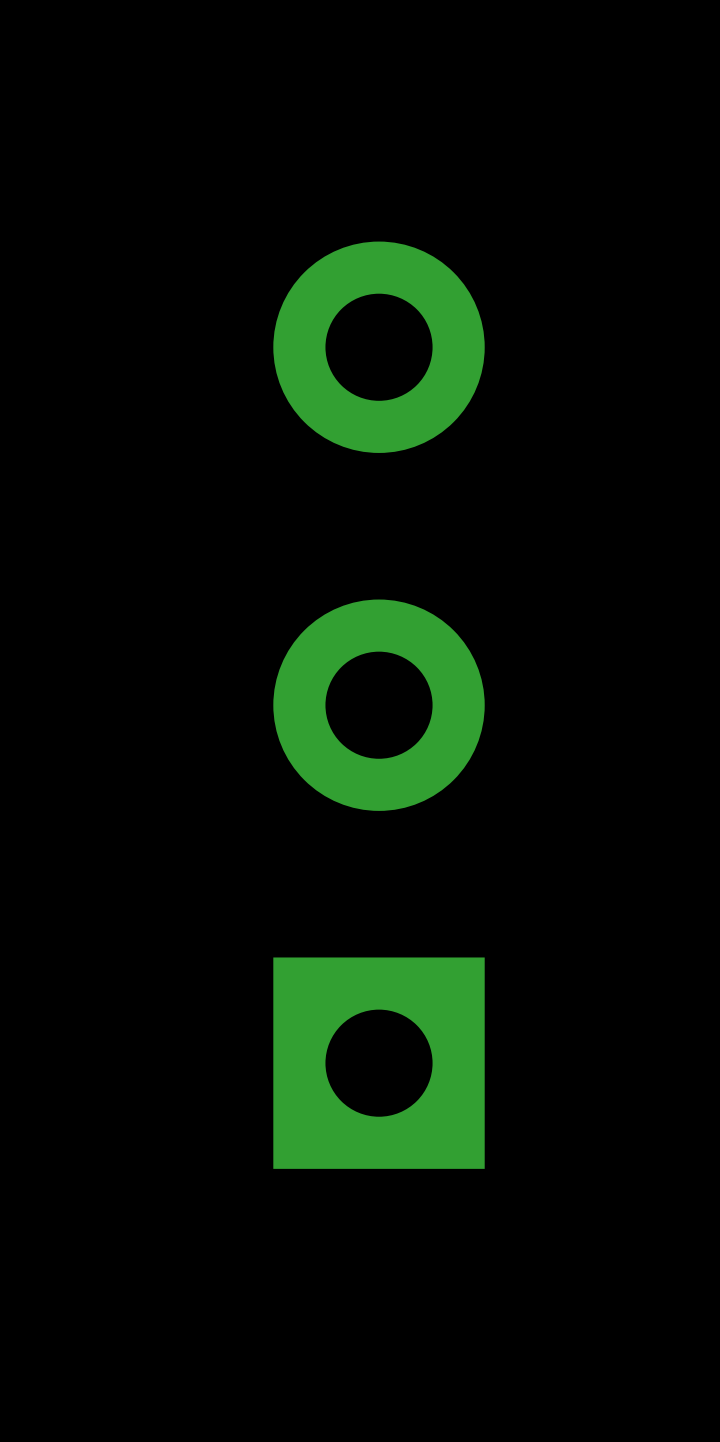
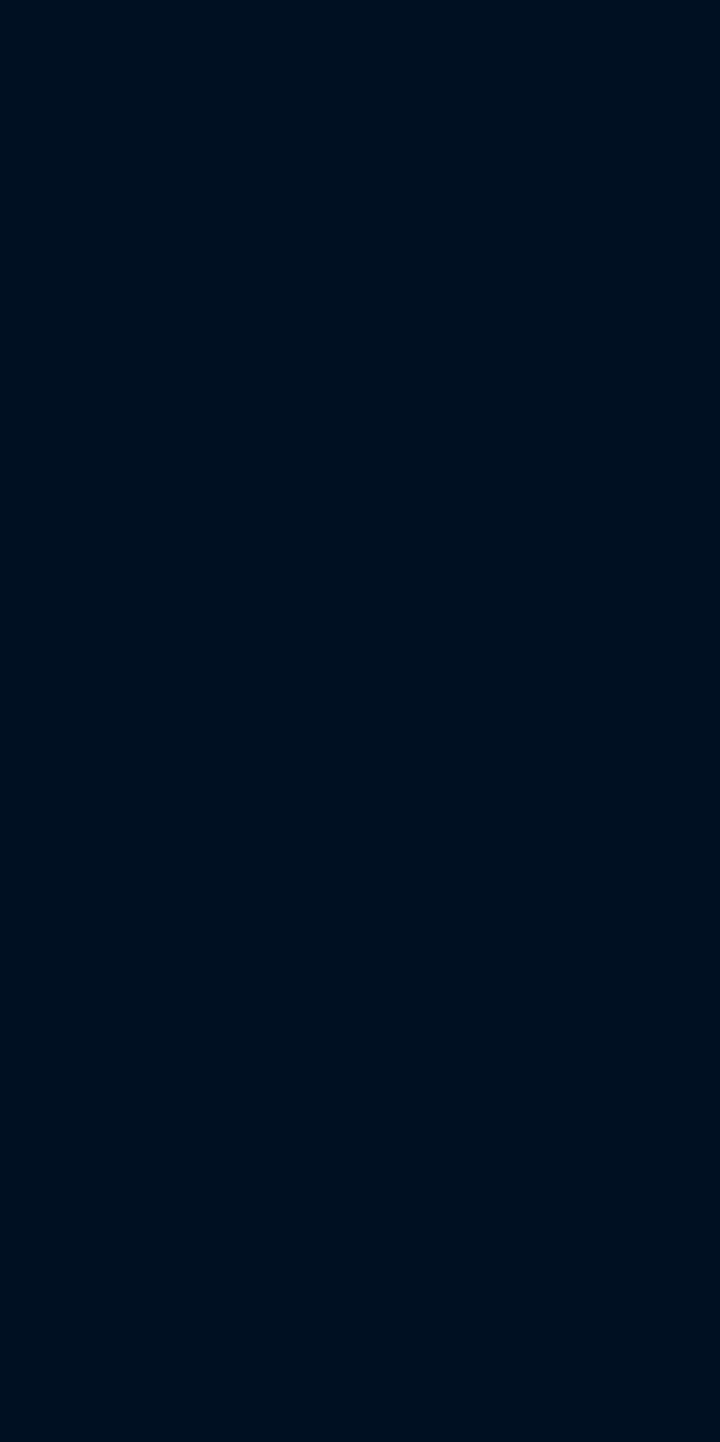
part: (379, 705) -> none

